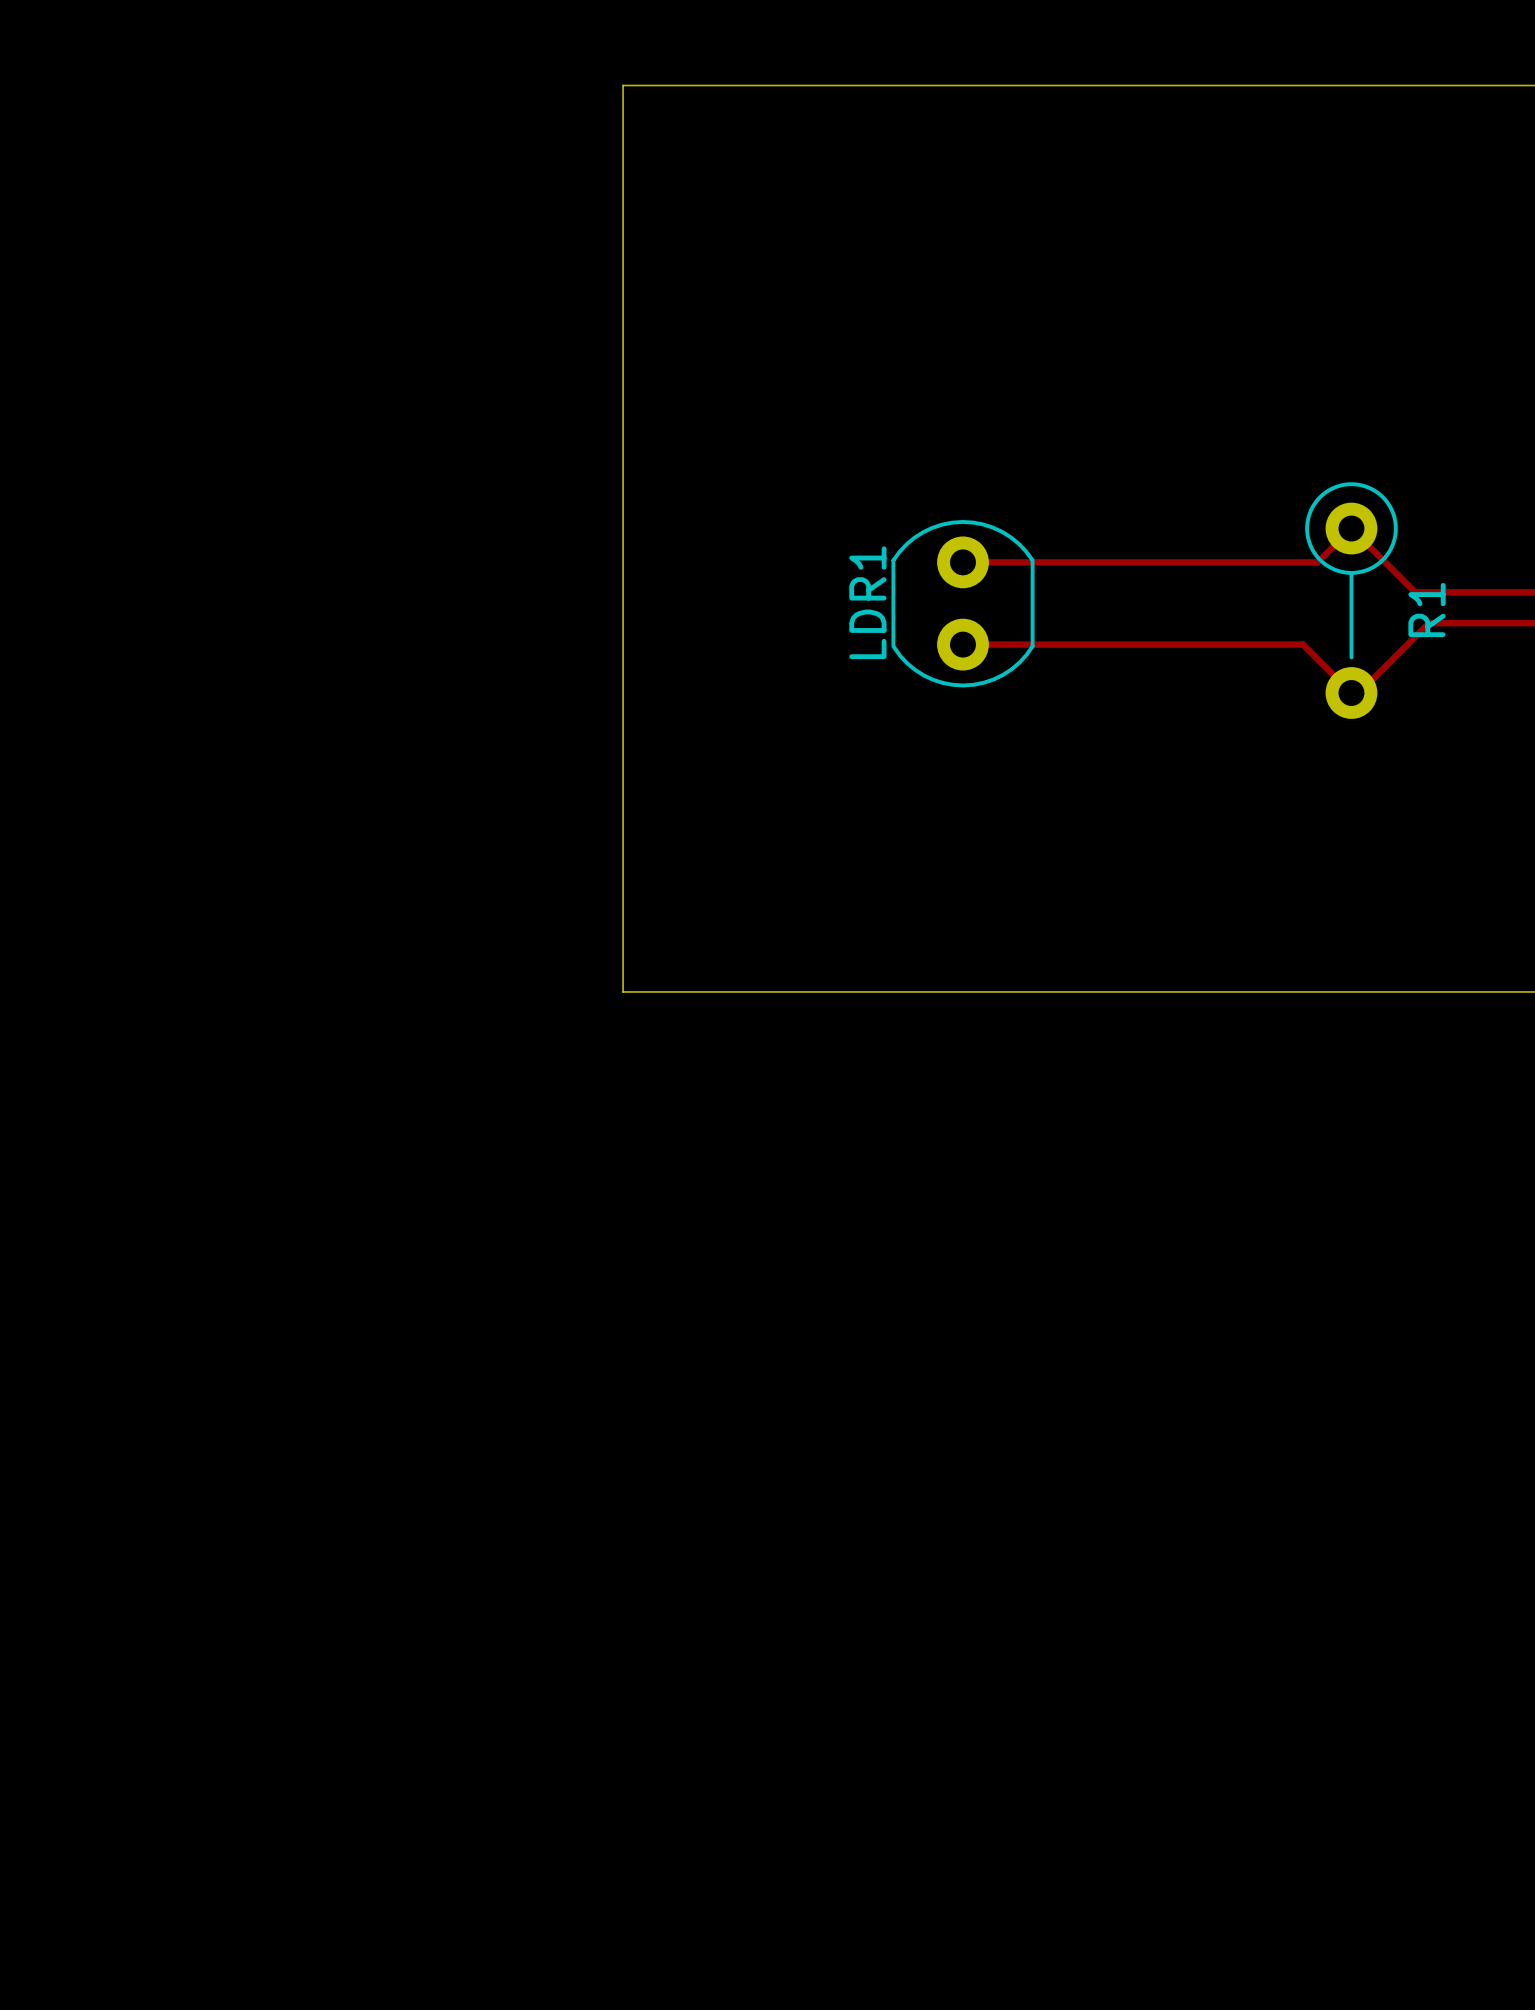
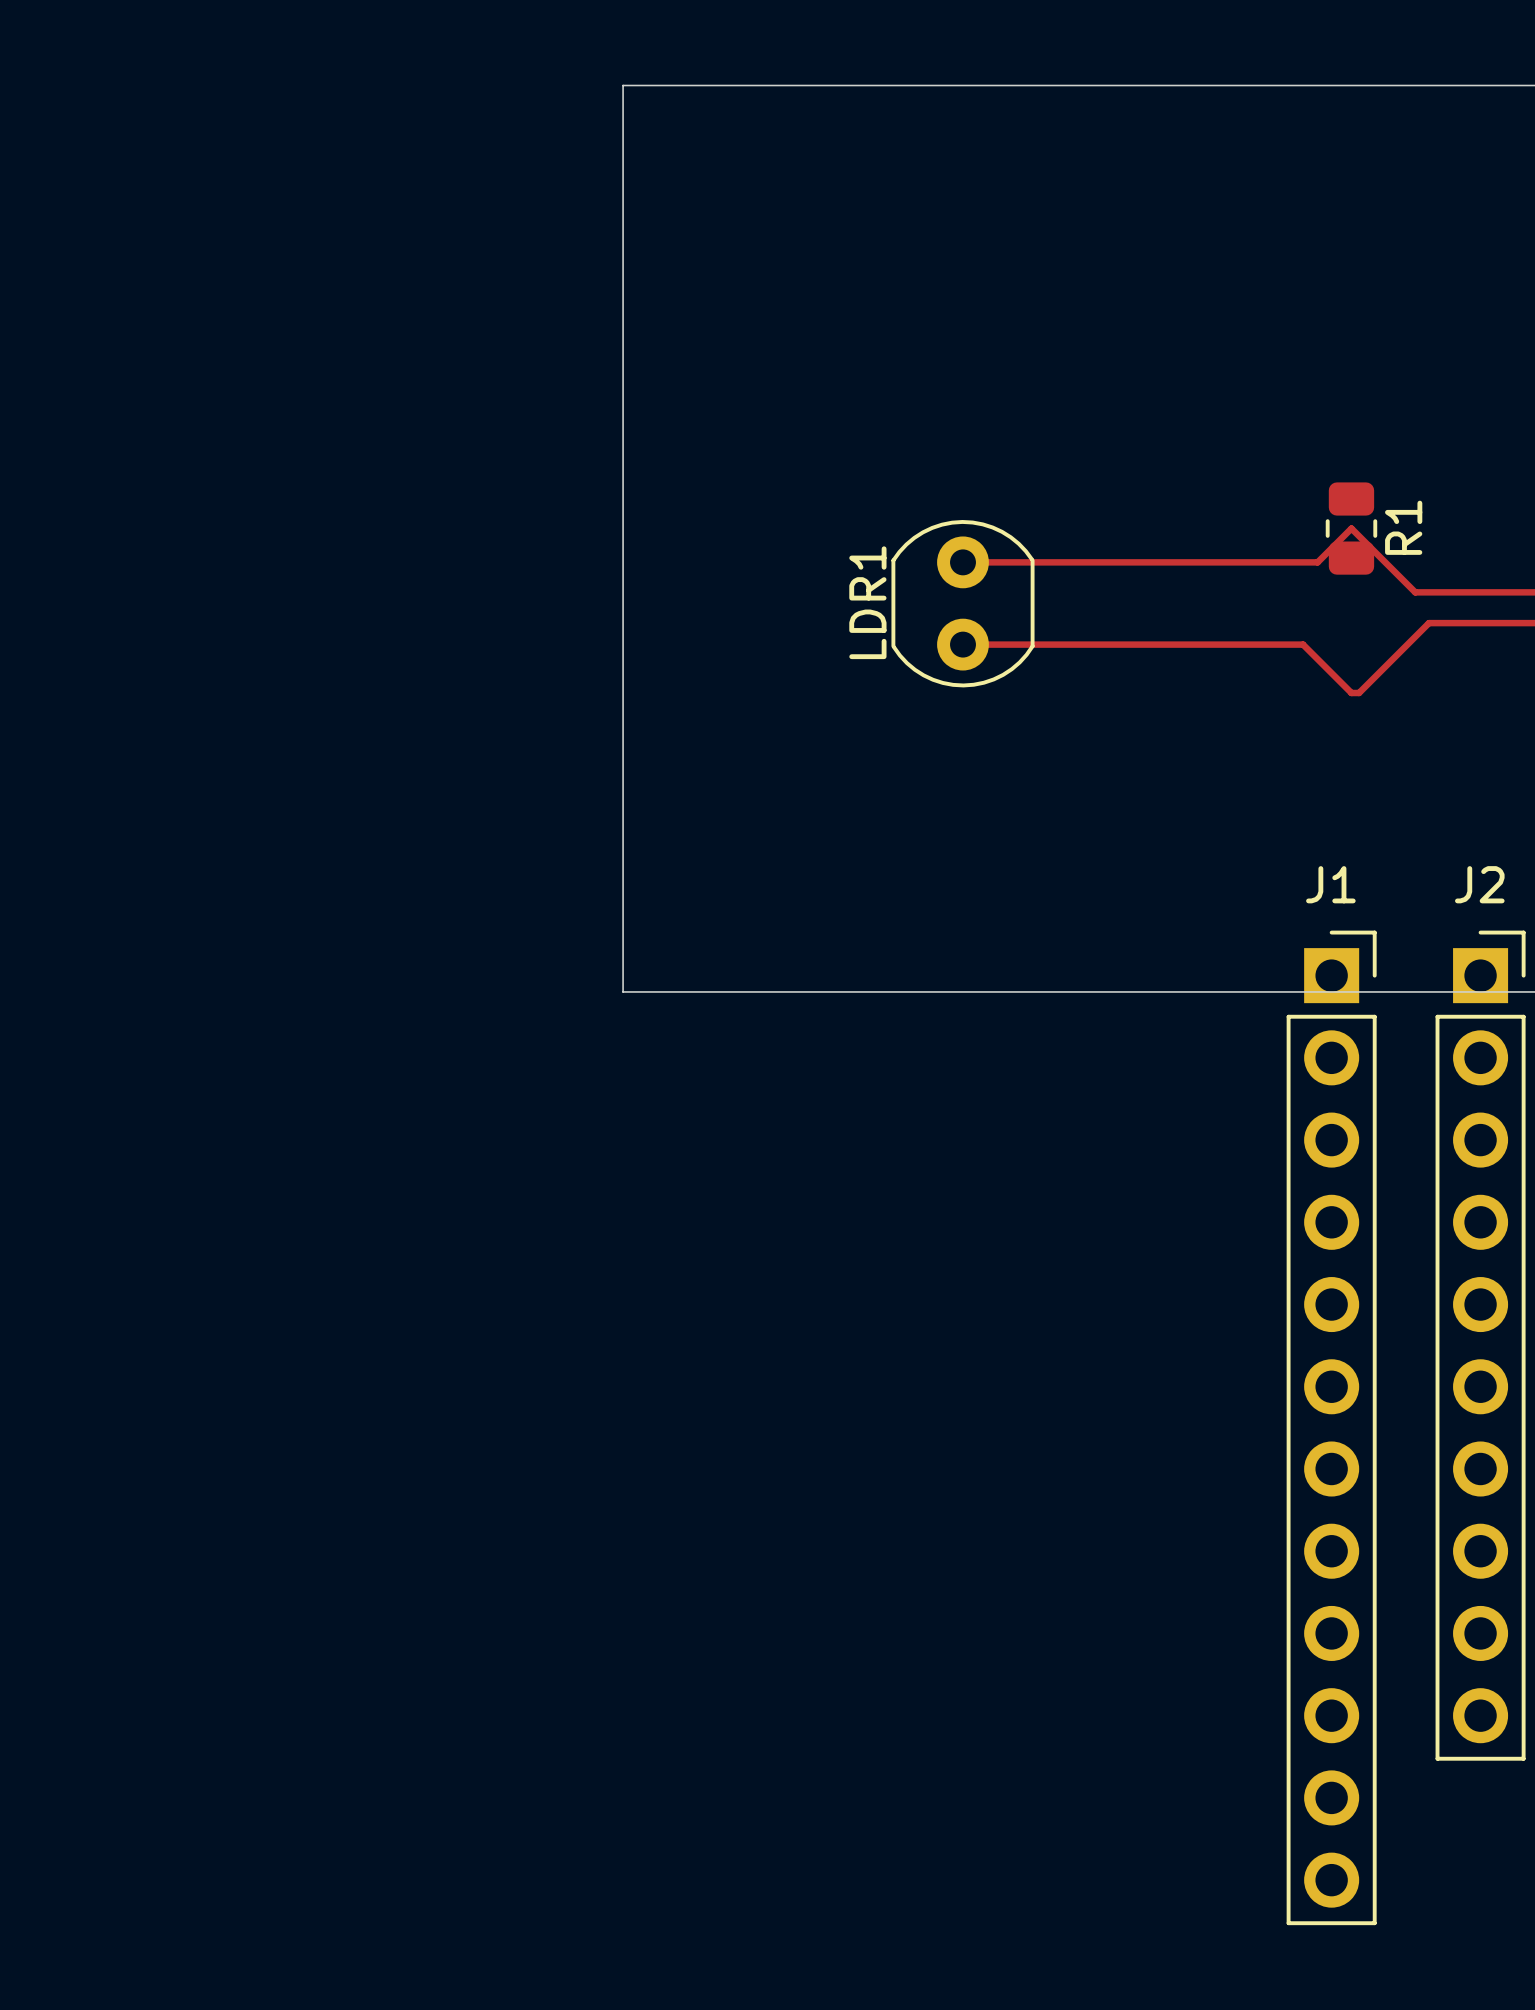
R1 footprint: [1305, 482, 1398, 719] -> [1325, 482, 1378, 575]
J2: none -> (1480, 1345)
J1: none -> (1331, 1427)

